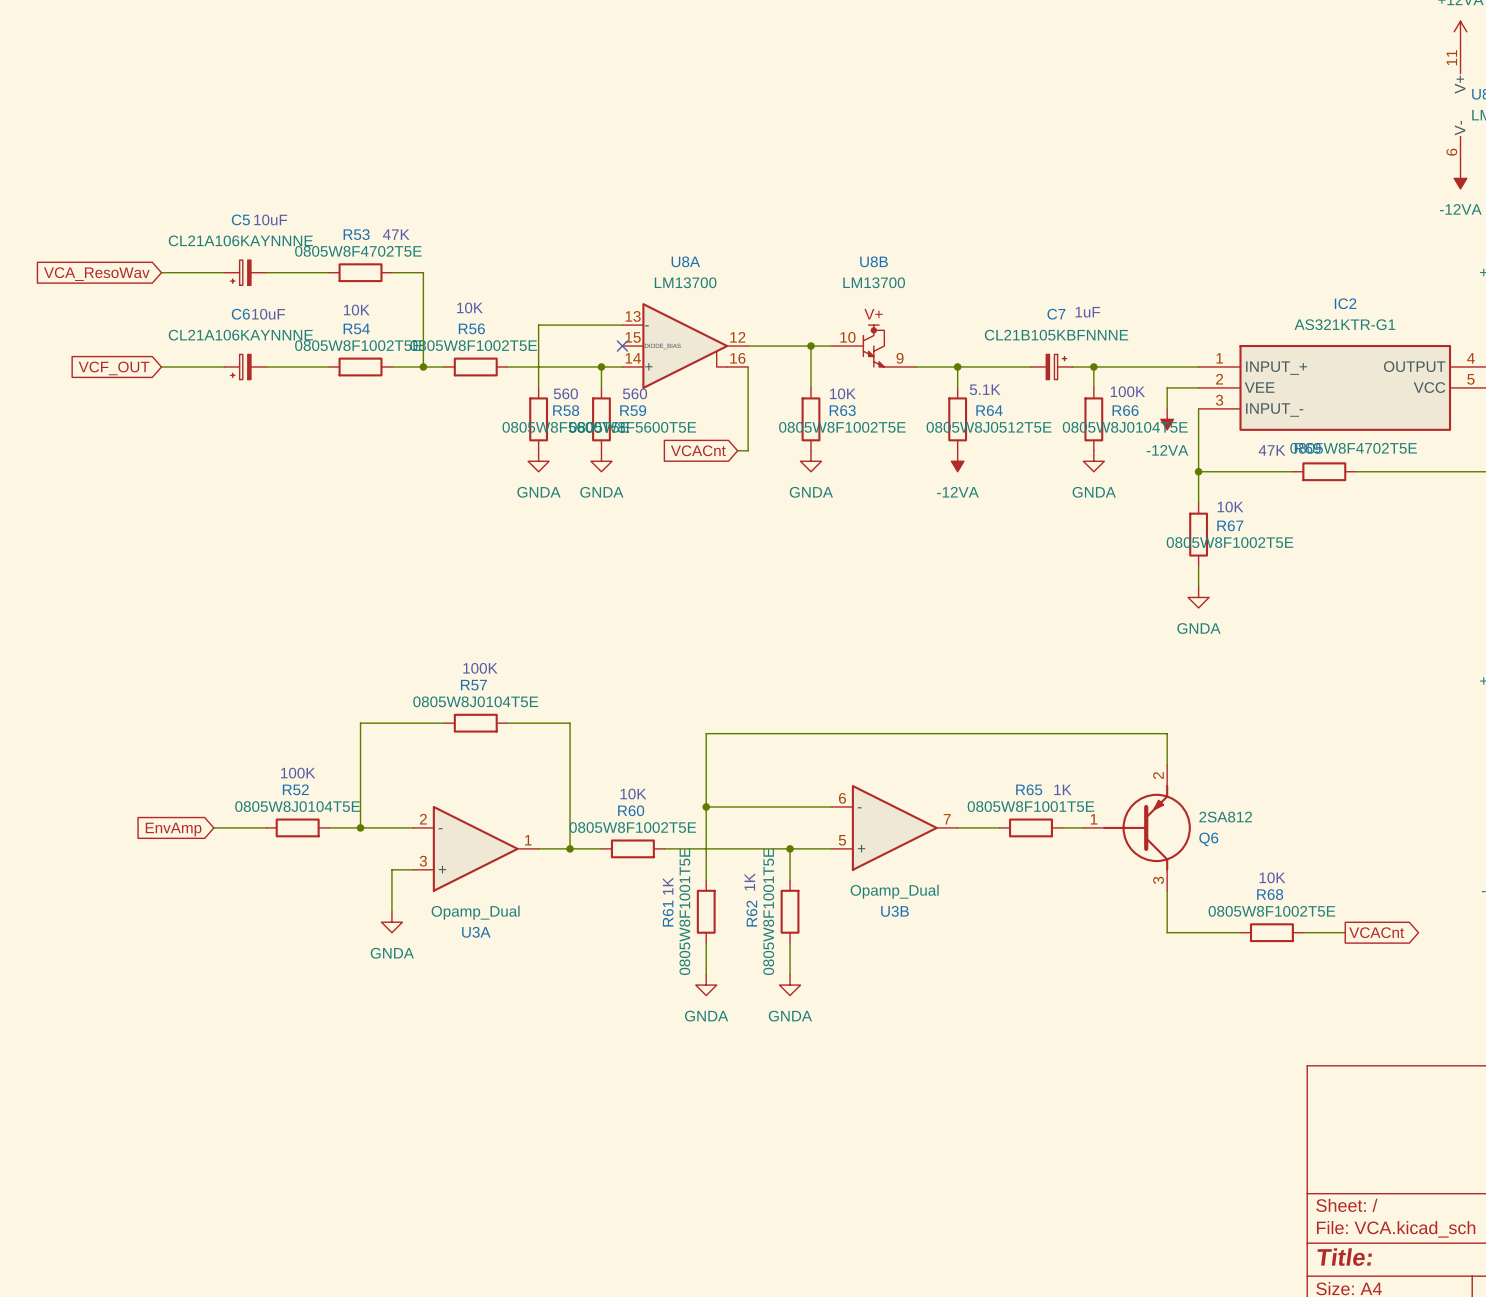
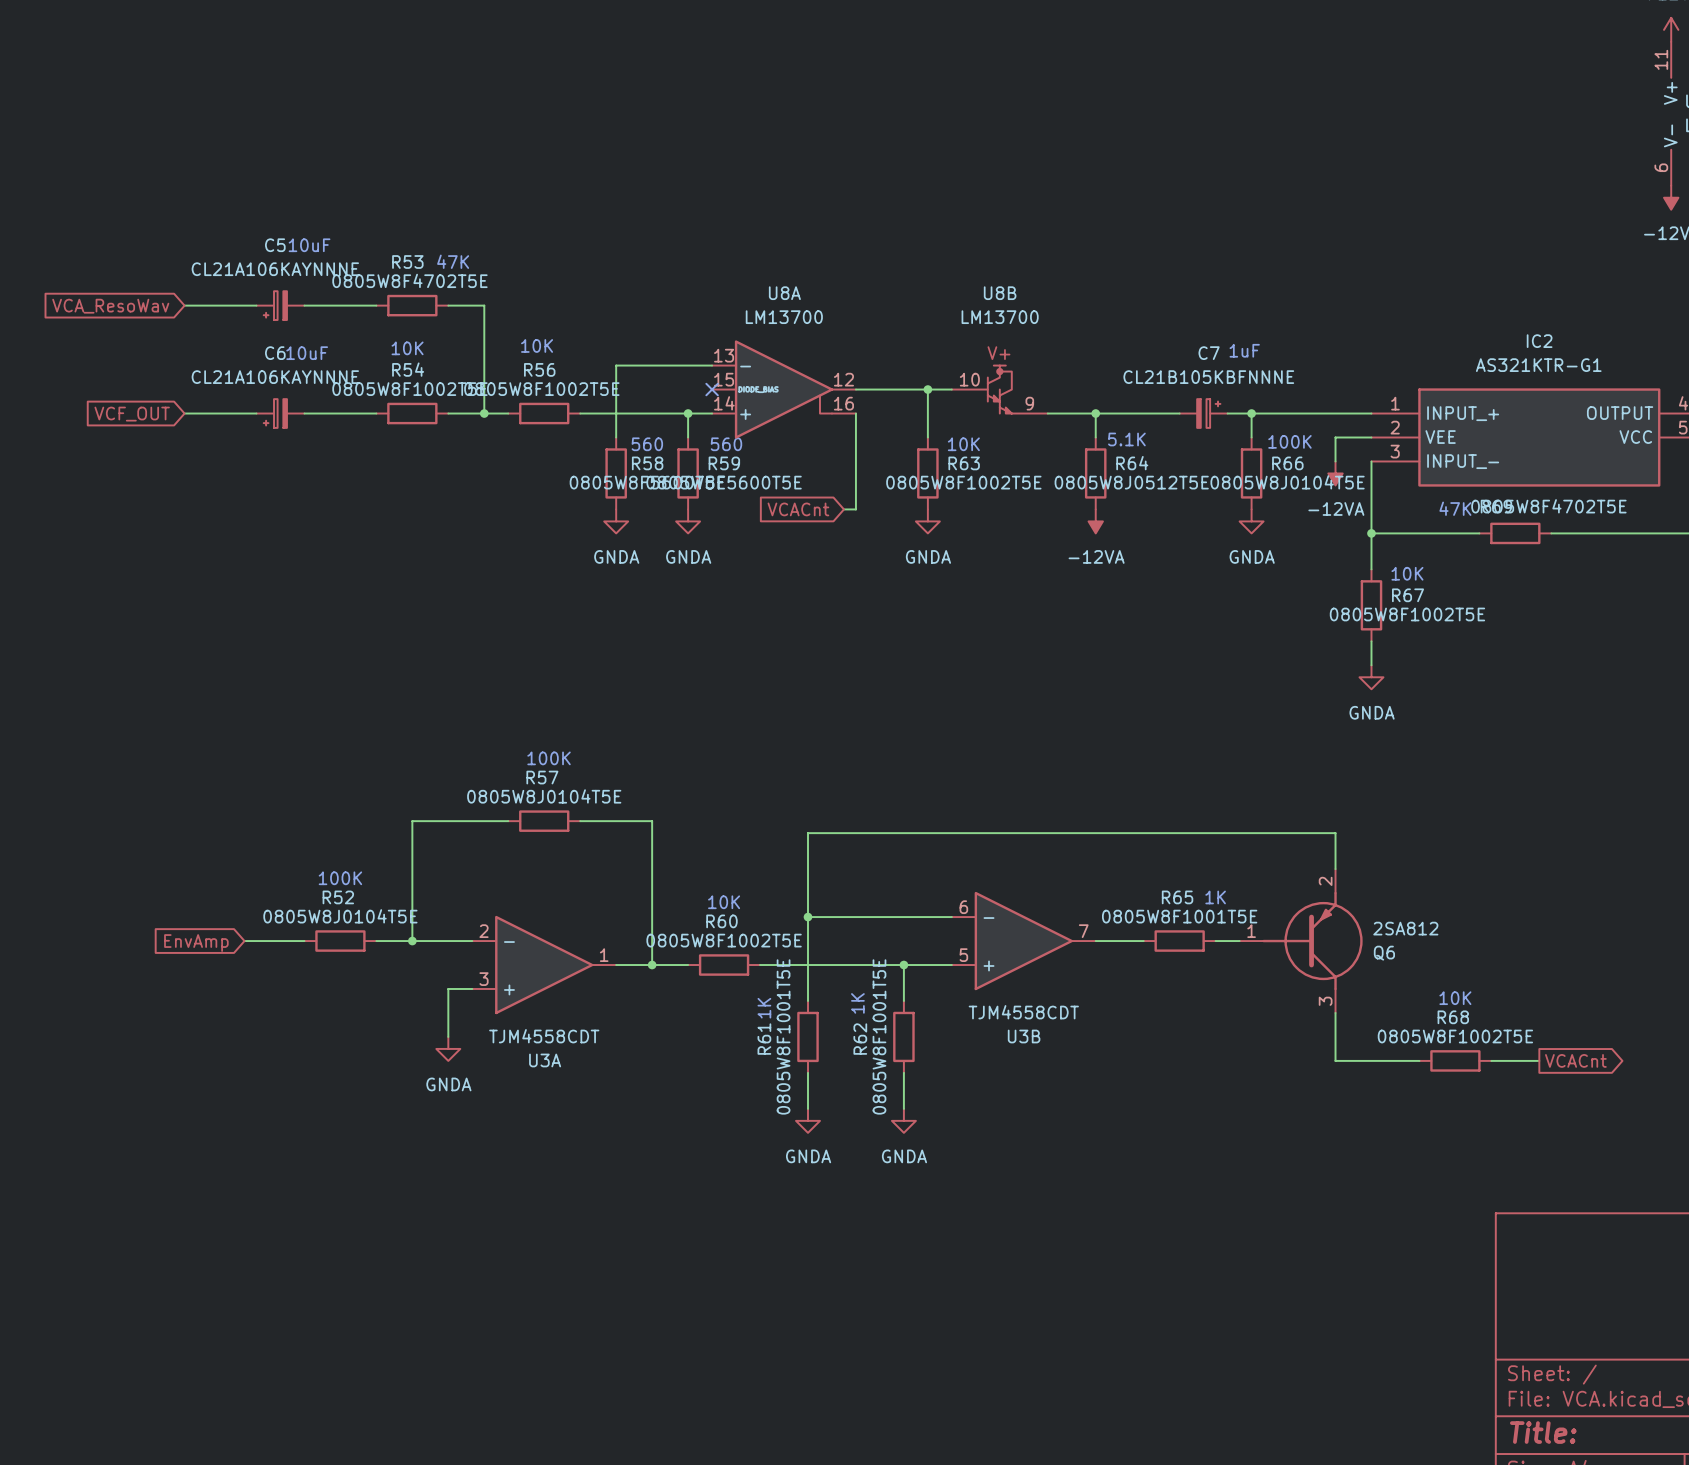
U3B value: Opamp_Dual (894, 891) -> TJM4558CDT (1023, 1012)
U3A value: Opamp_Dual (475, 912) -> TJM4558CDT (544, 1036)

